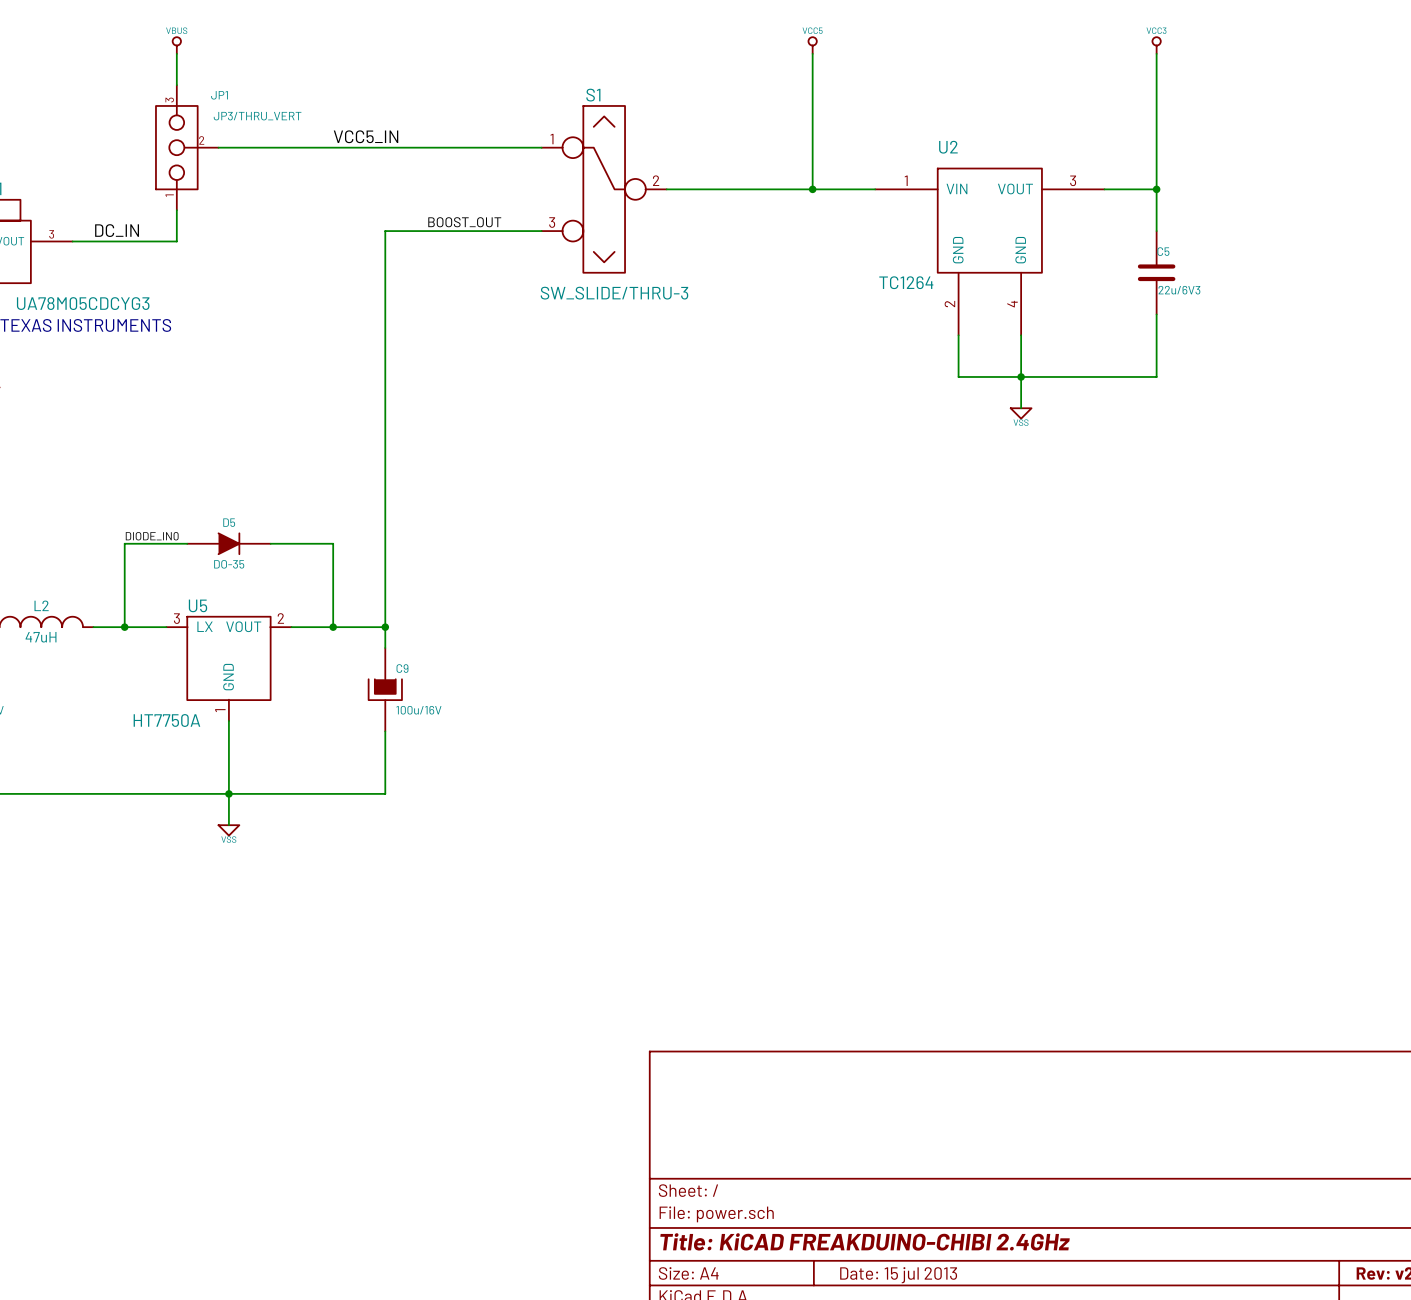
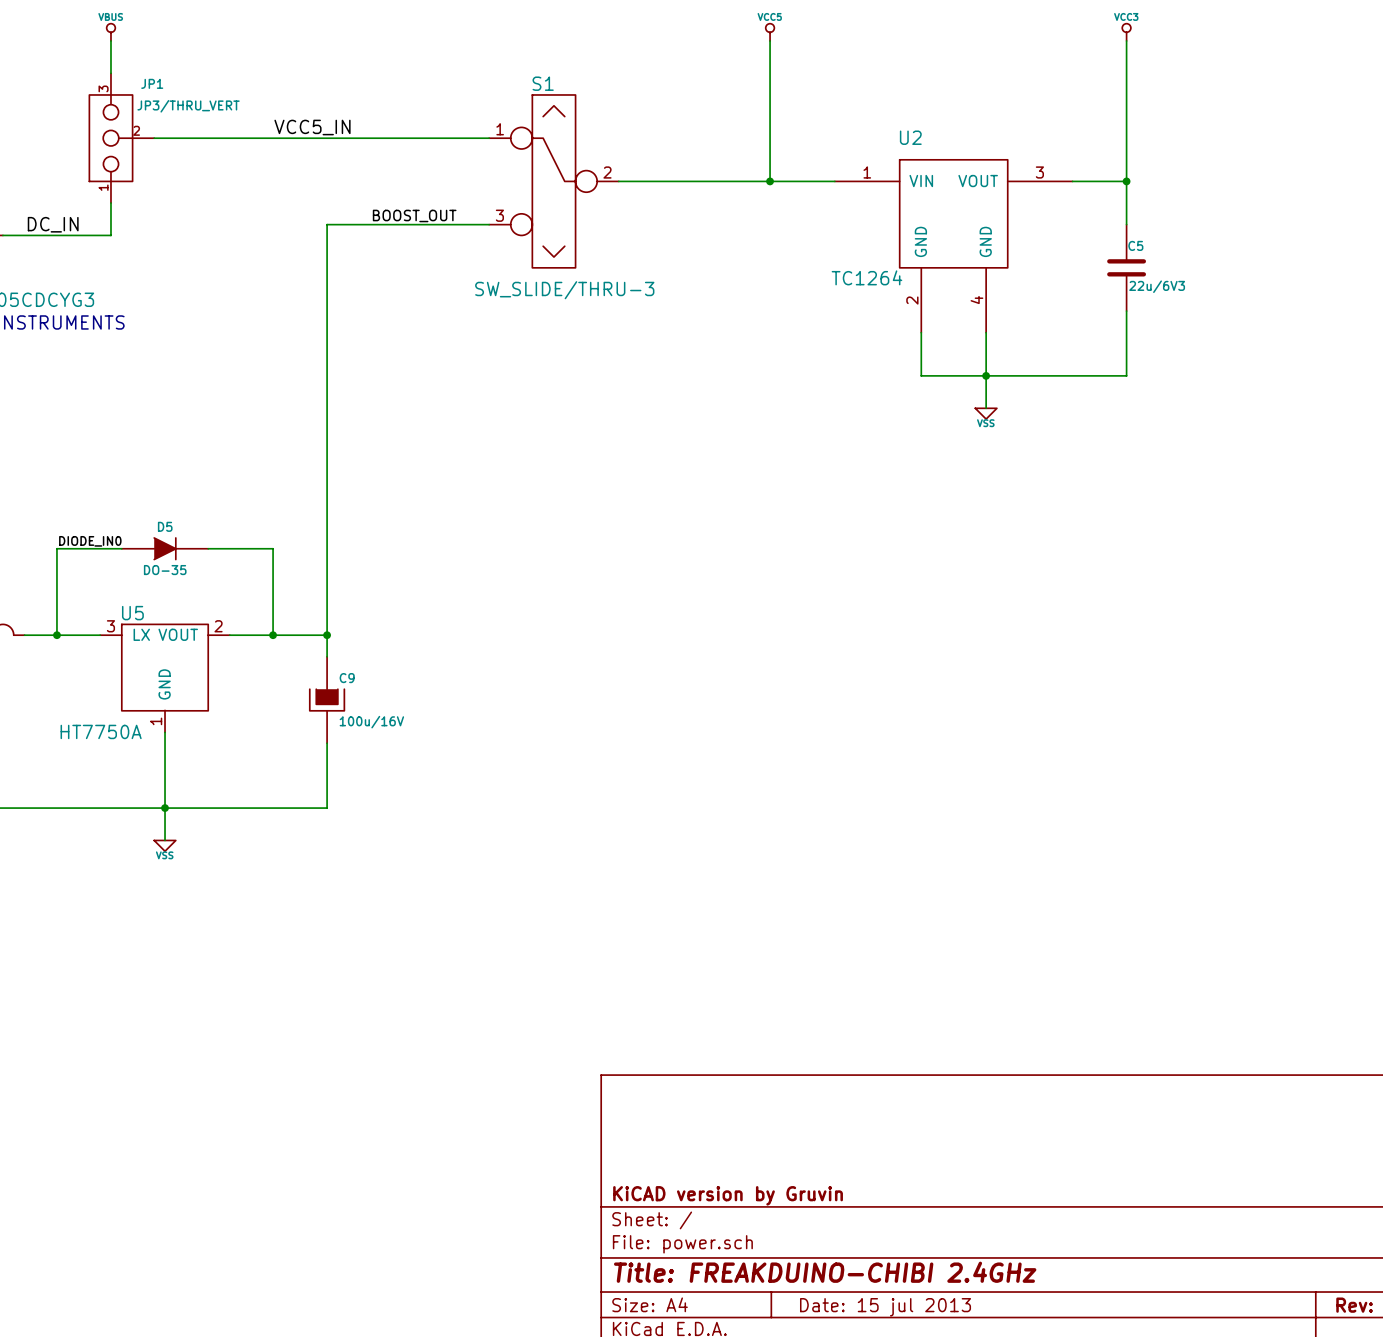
title block: none -> KiCAD version by Gruvin (728, 1195)
title block: Title: KiCAD FREAKDUINO-CHIBI 2.4GHz (865, 1241) -> Title: FREAKDUINO-CHIBI 2.4GHz (825, 1272)

